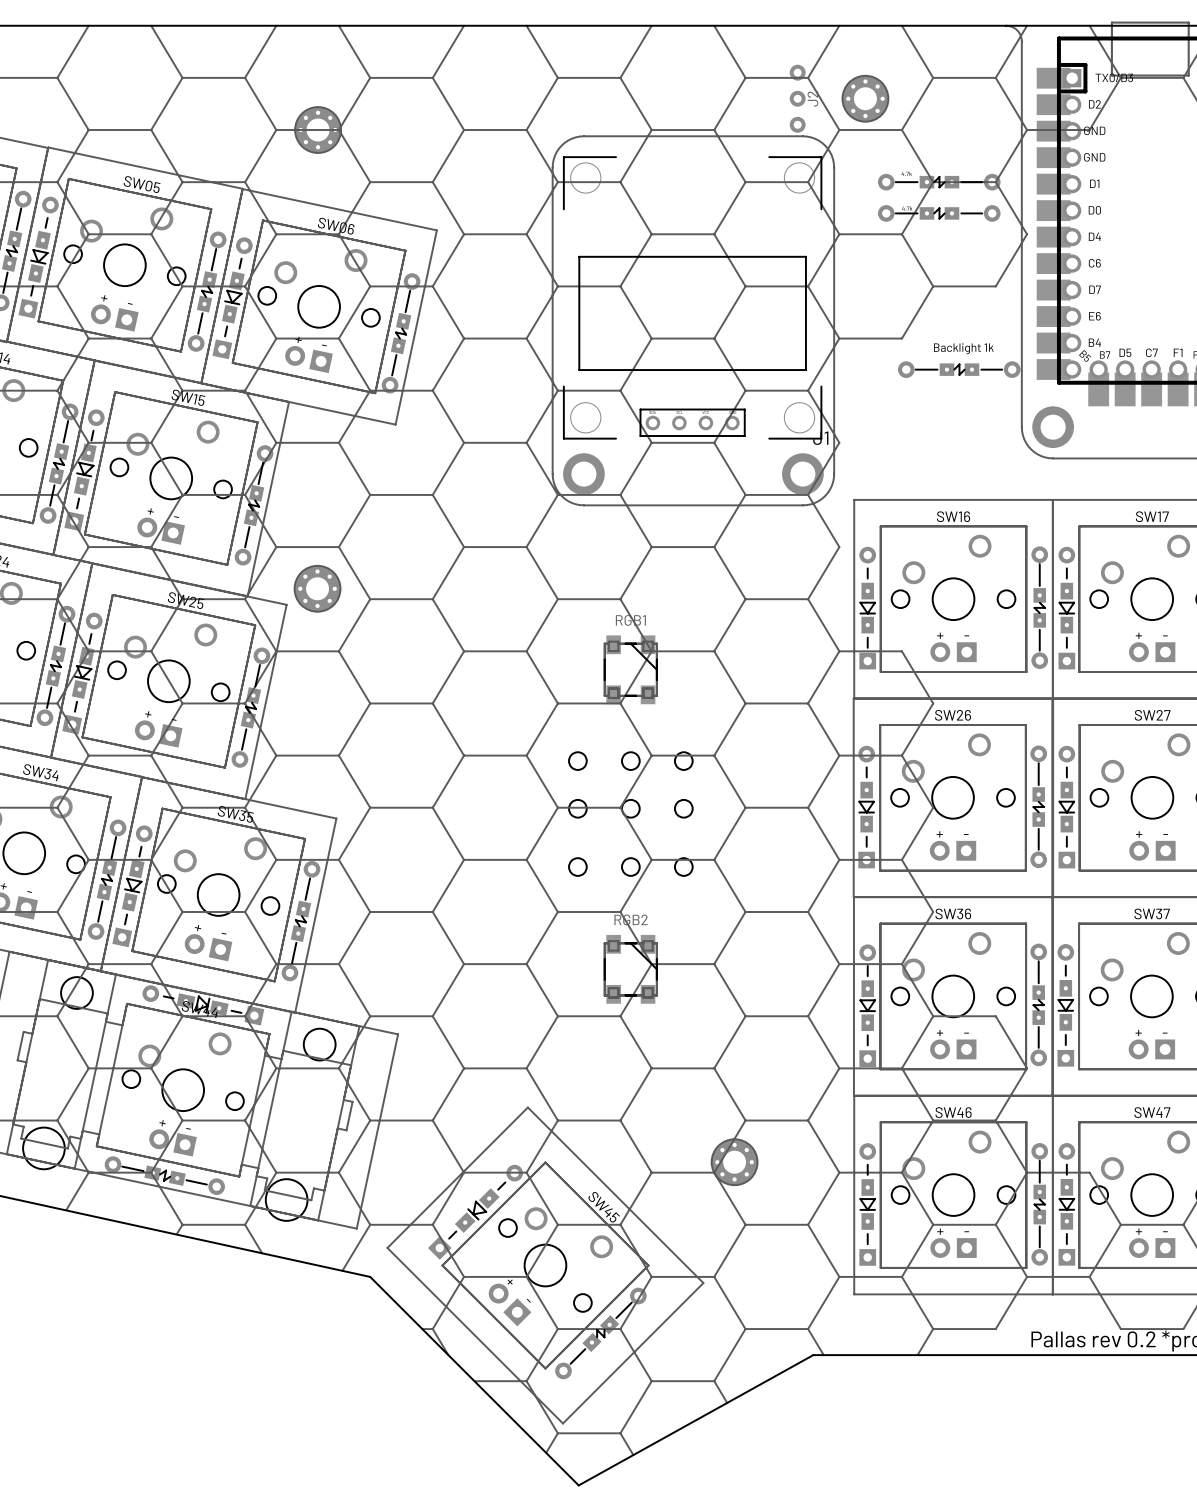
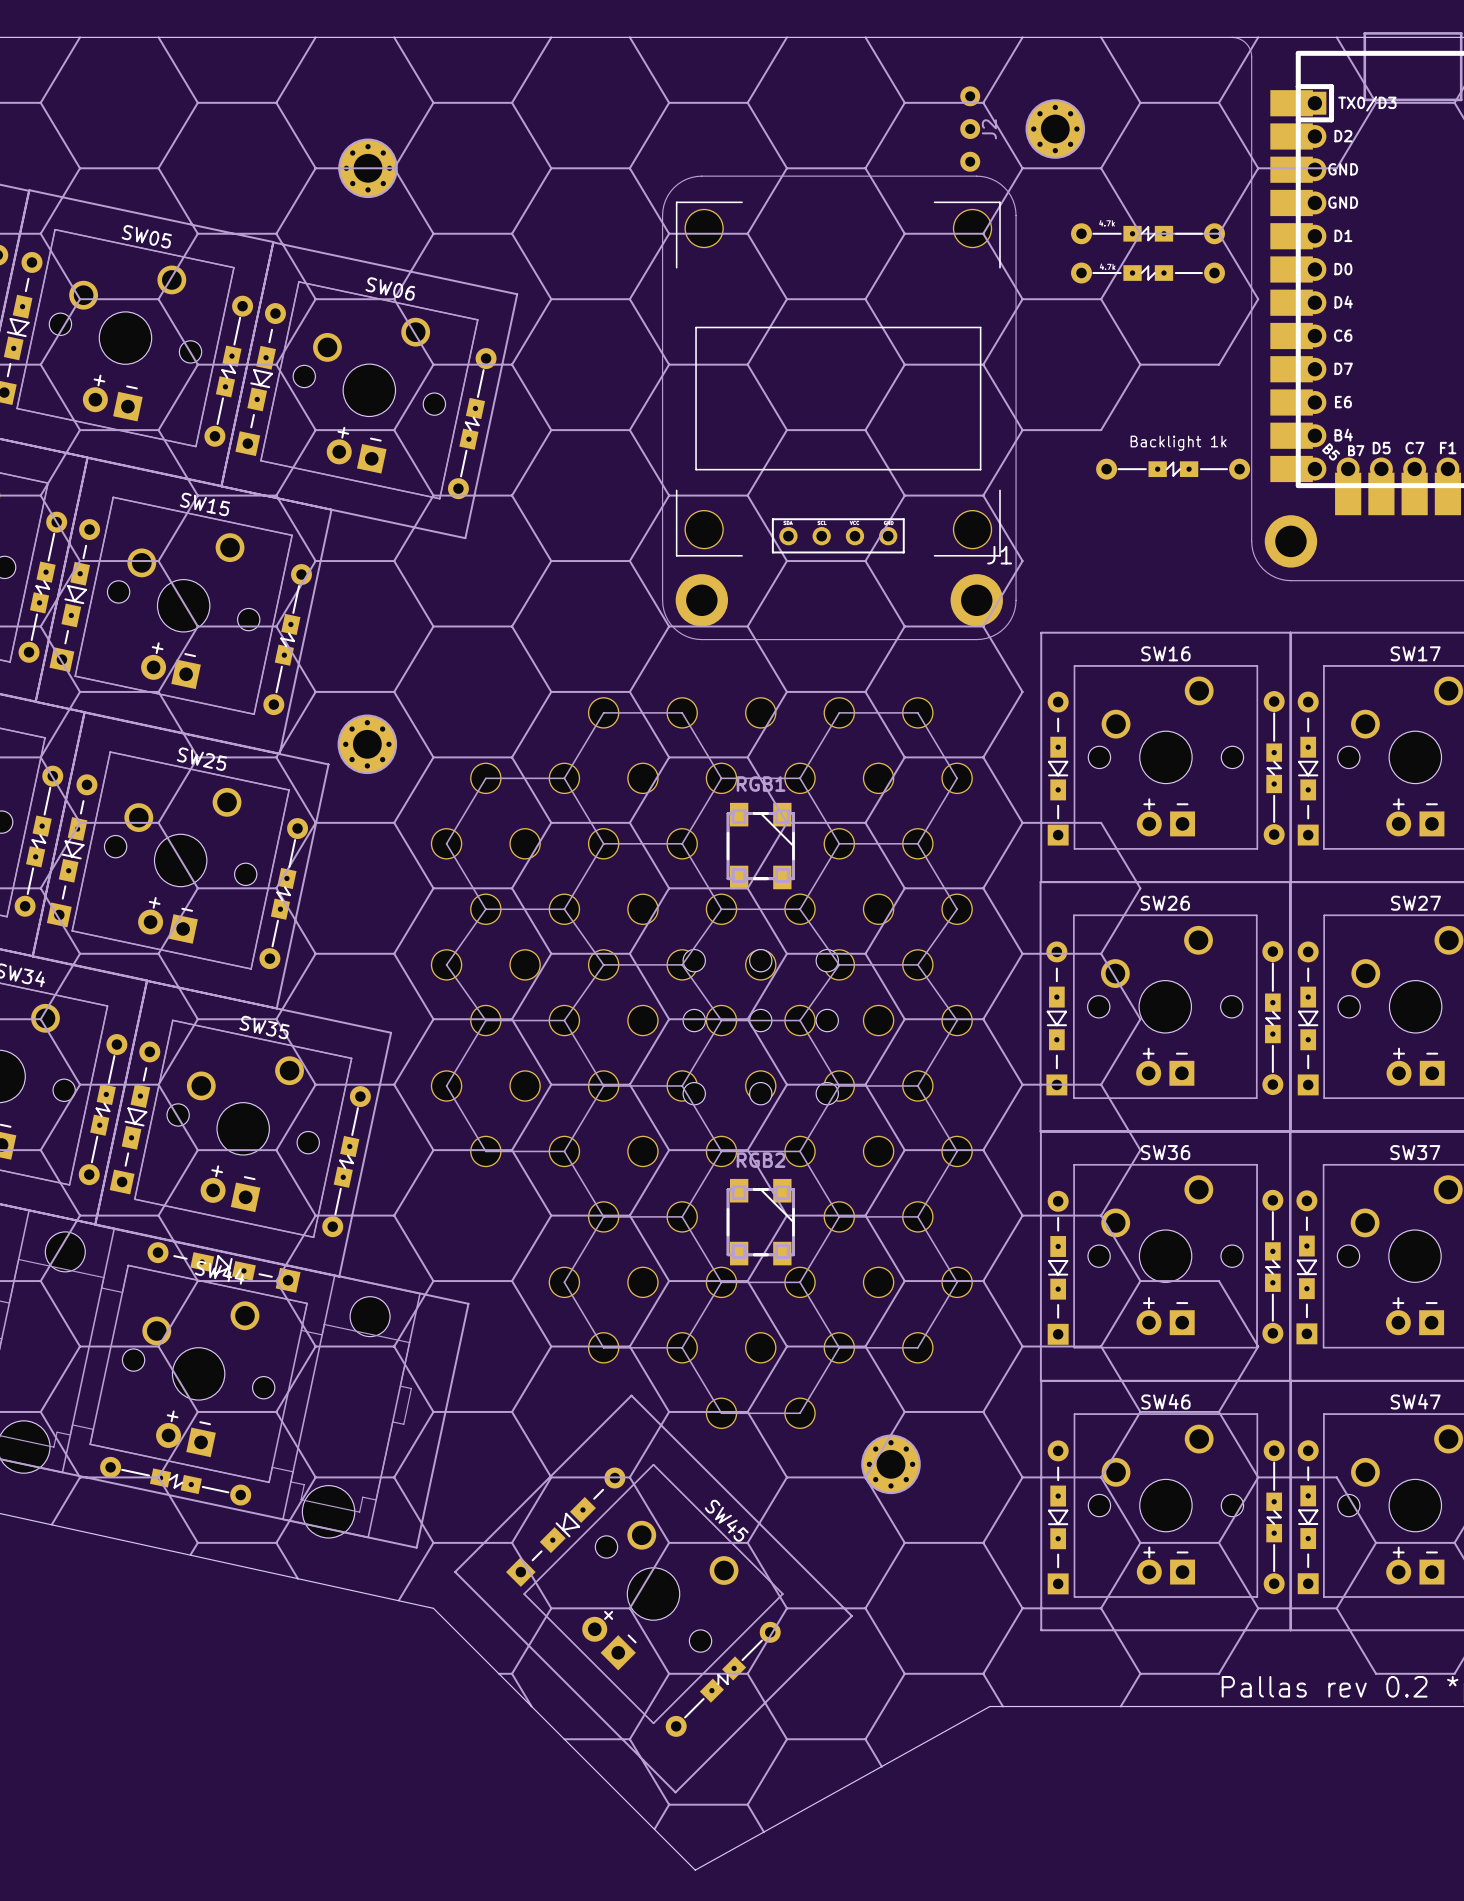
part: none -> (701, 1063)

